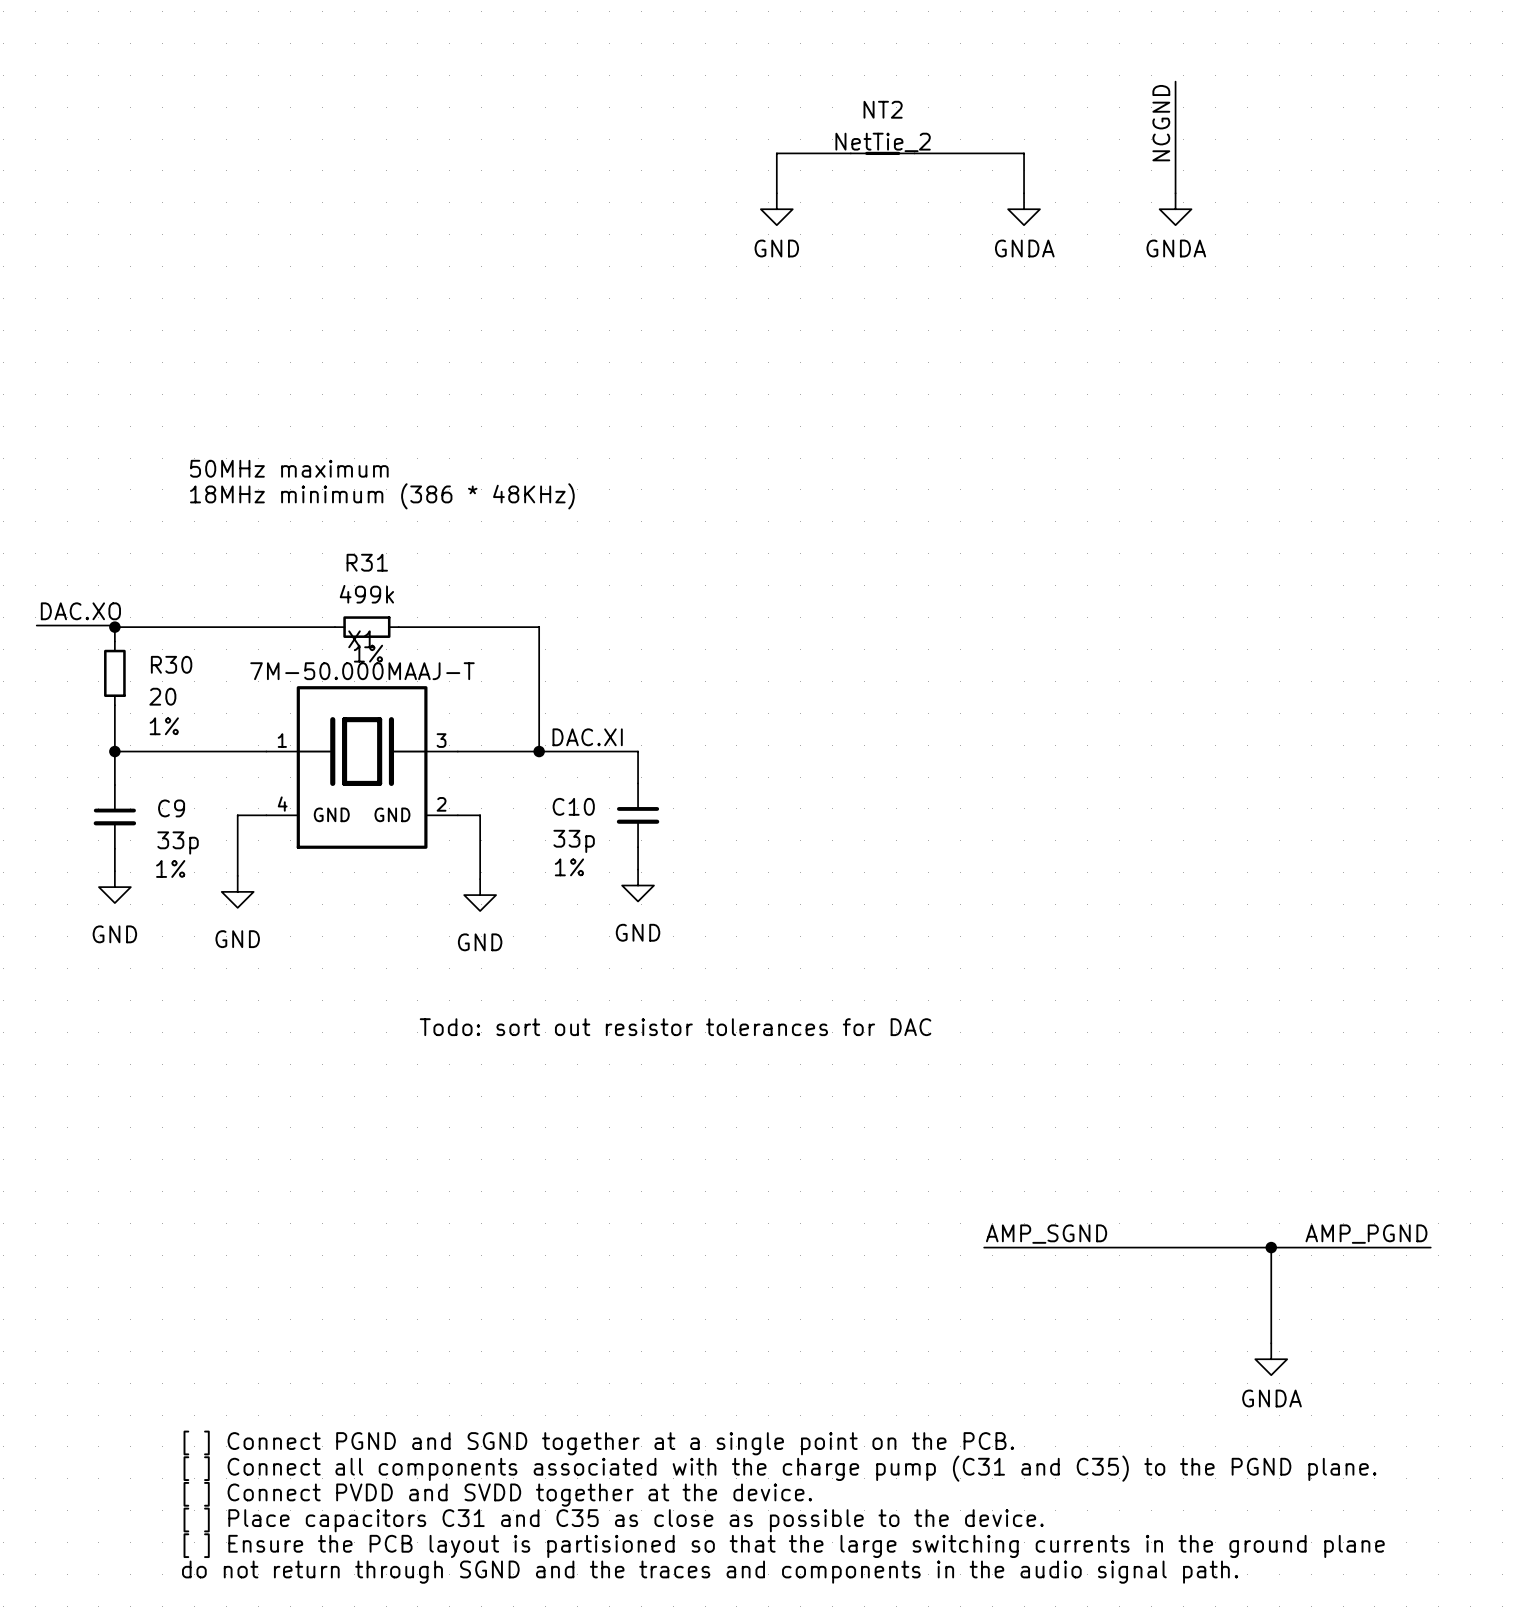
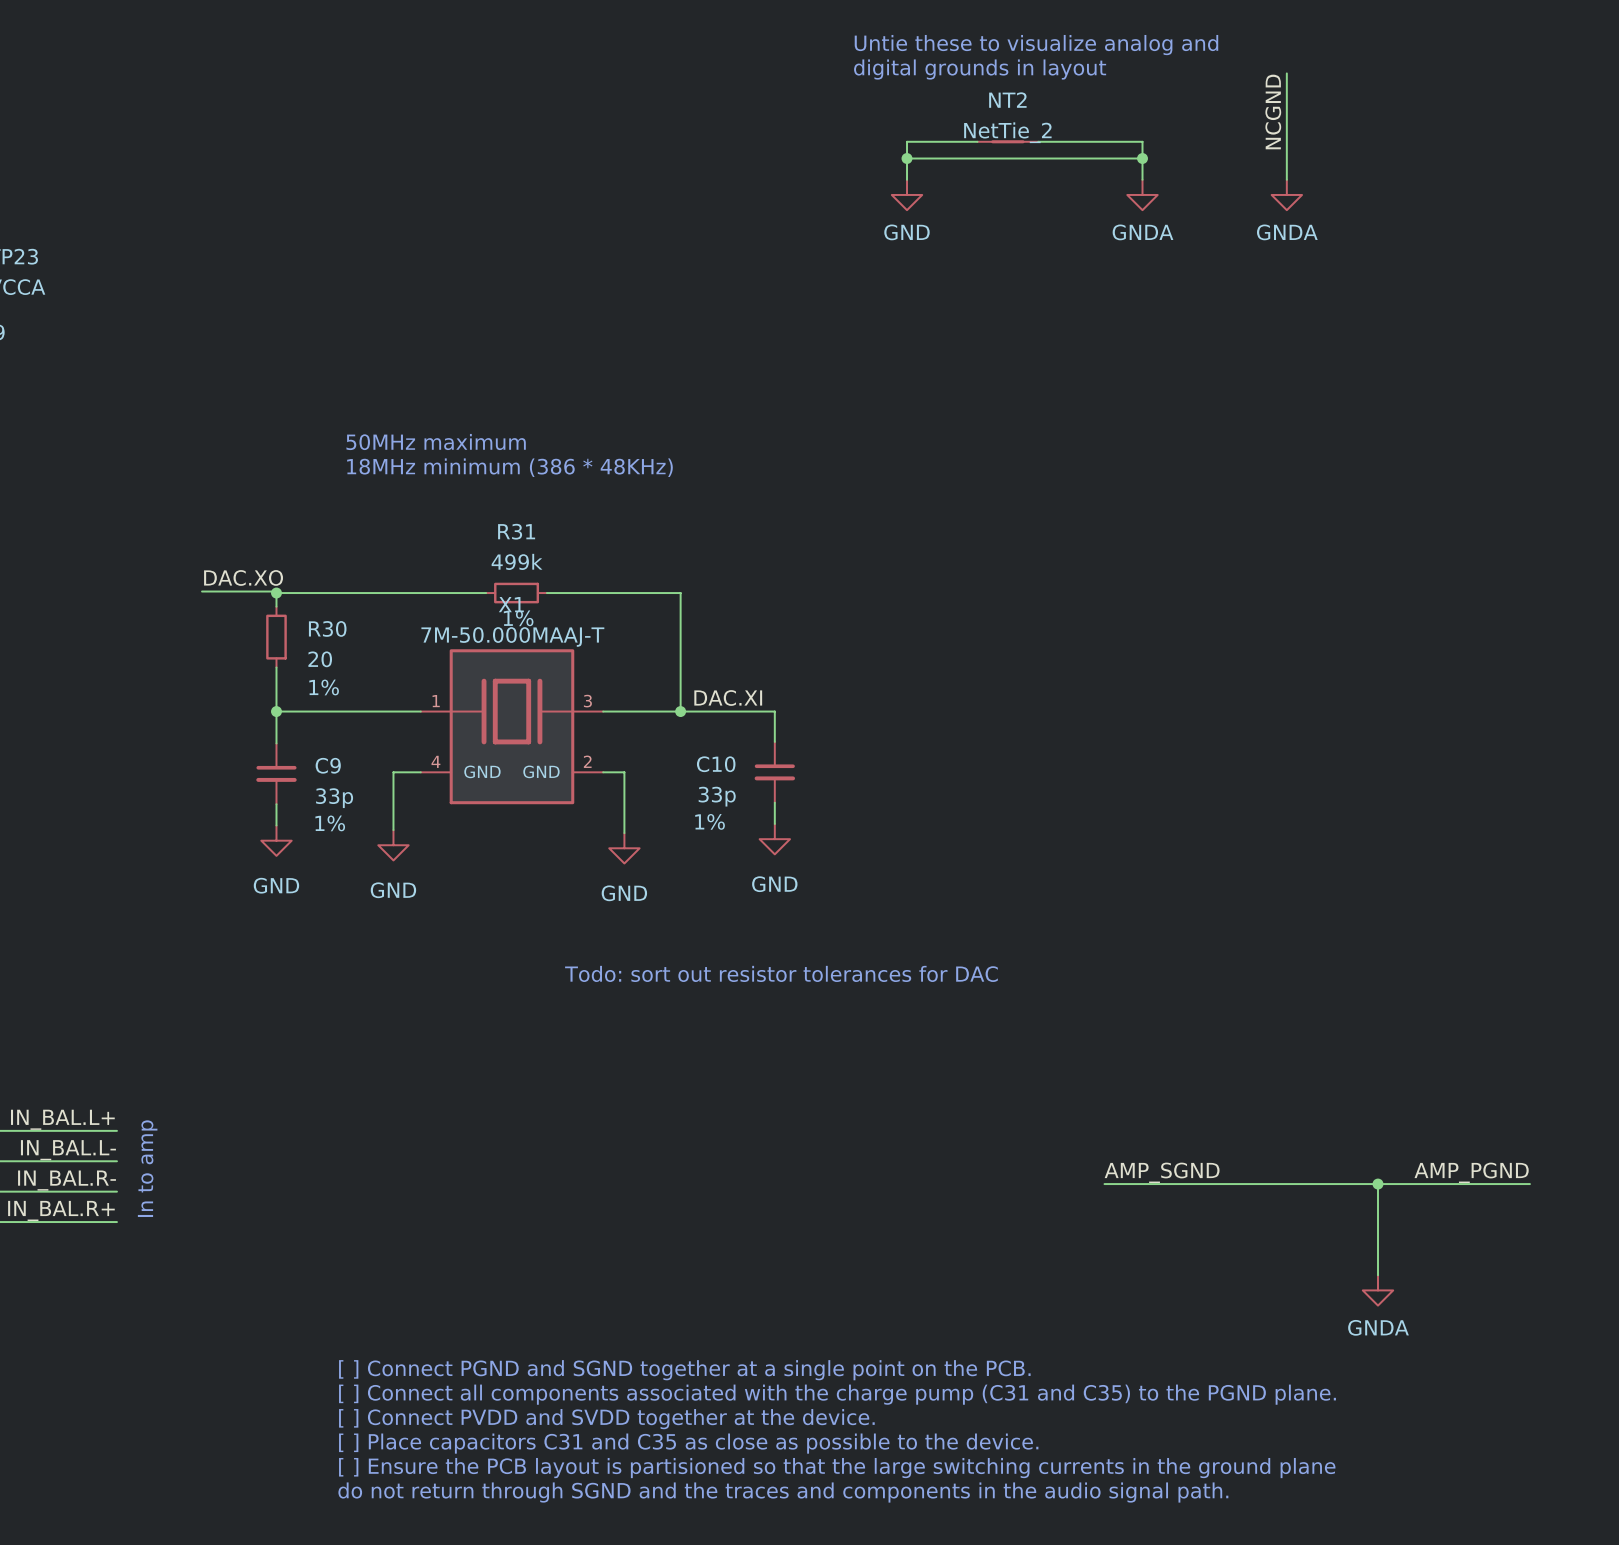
text: none -> Untie these to visualize analog and (1036, 45)
text: none -> digital grounds in layout (980, 69)
wire: none -> (907, 158) (1142, 158)
junction: none -> (907, 158)
junction: none -> (1142, 158)

